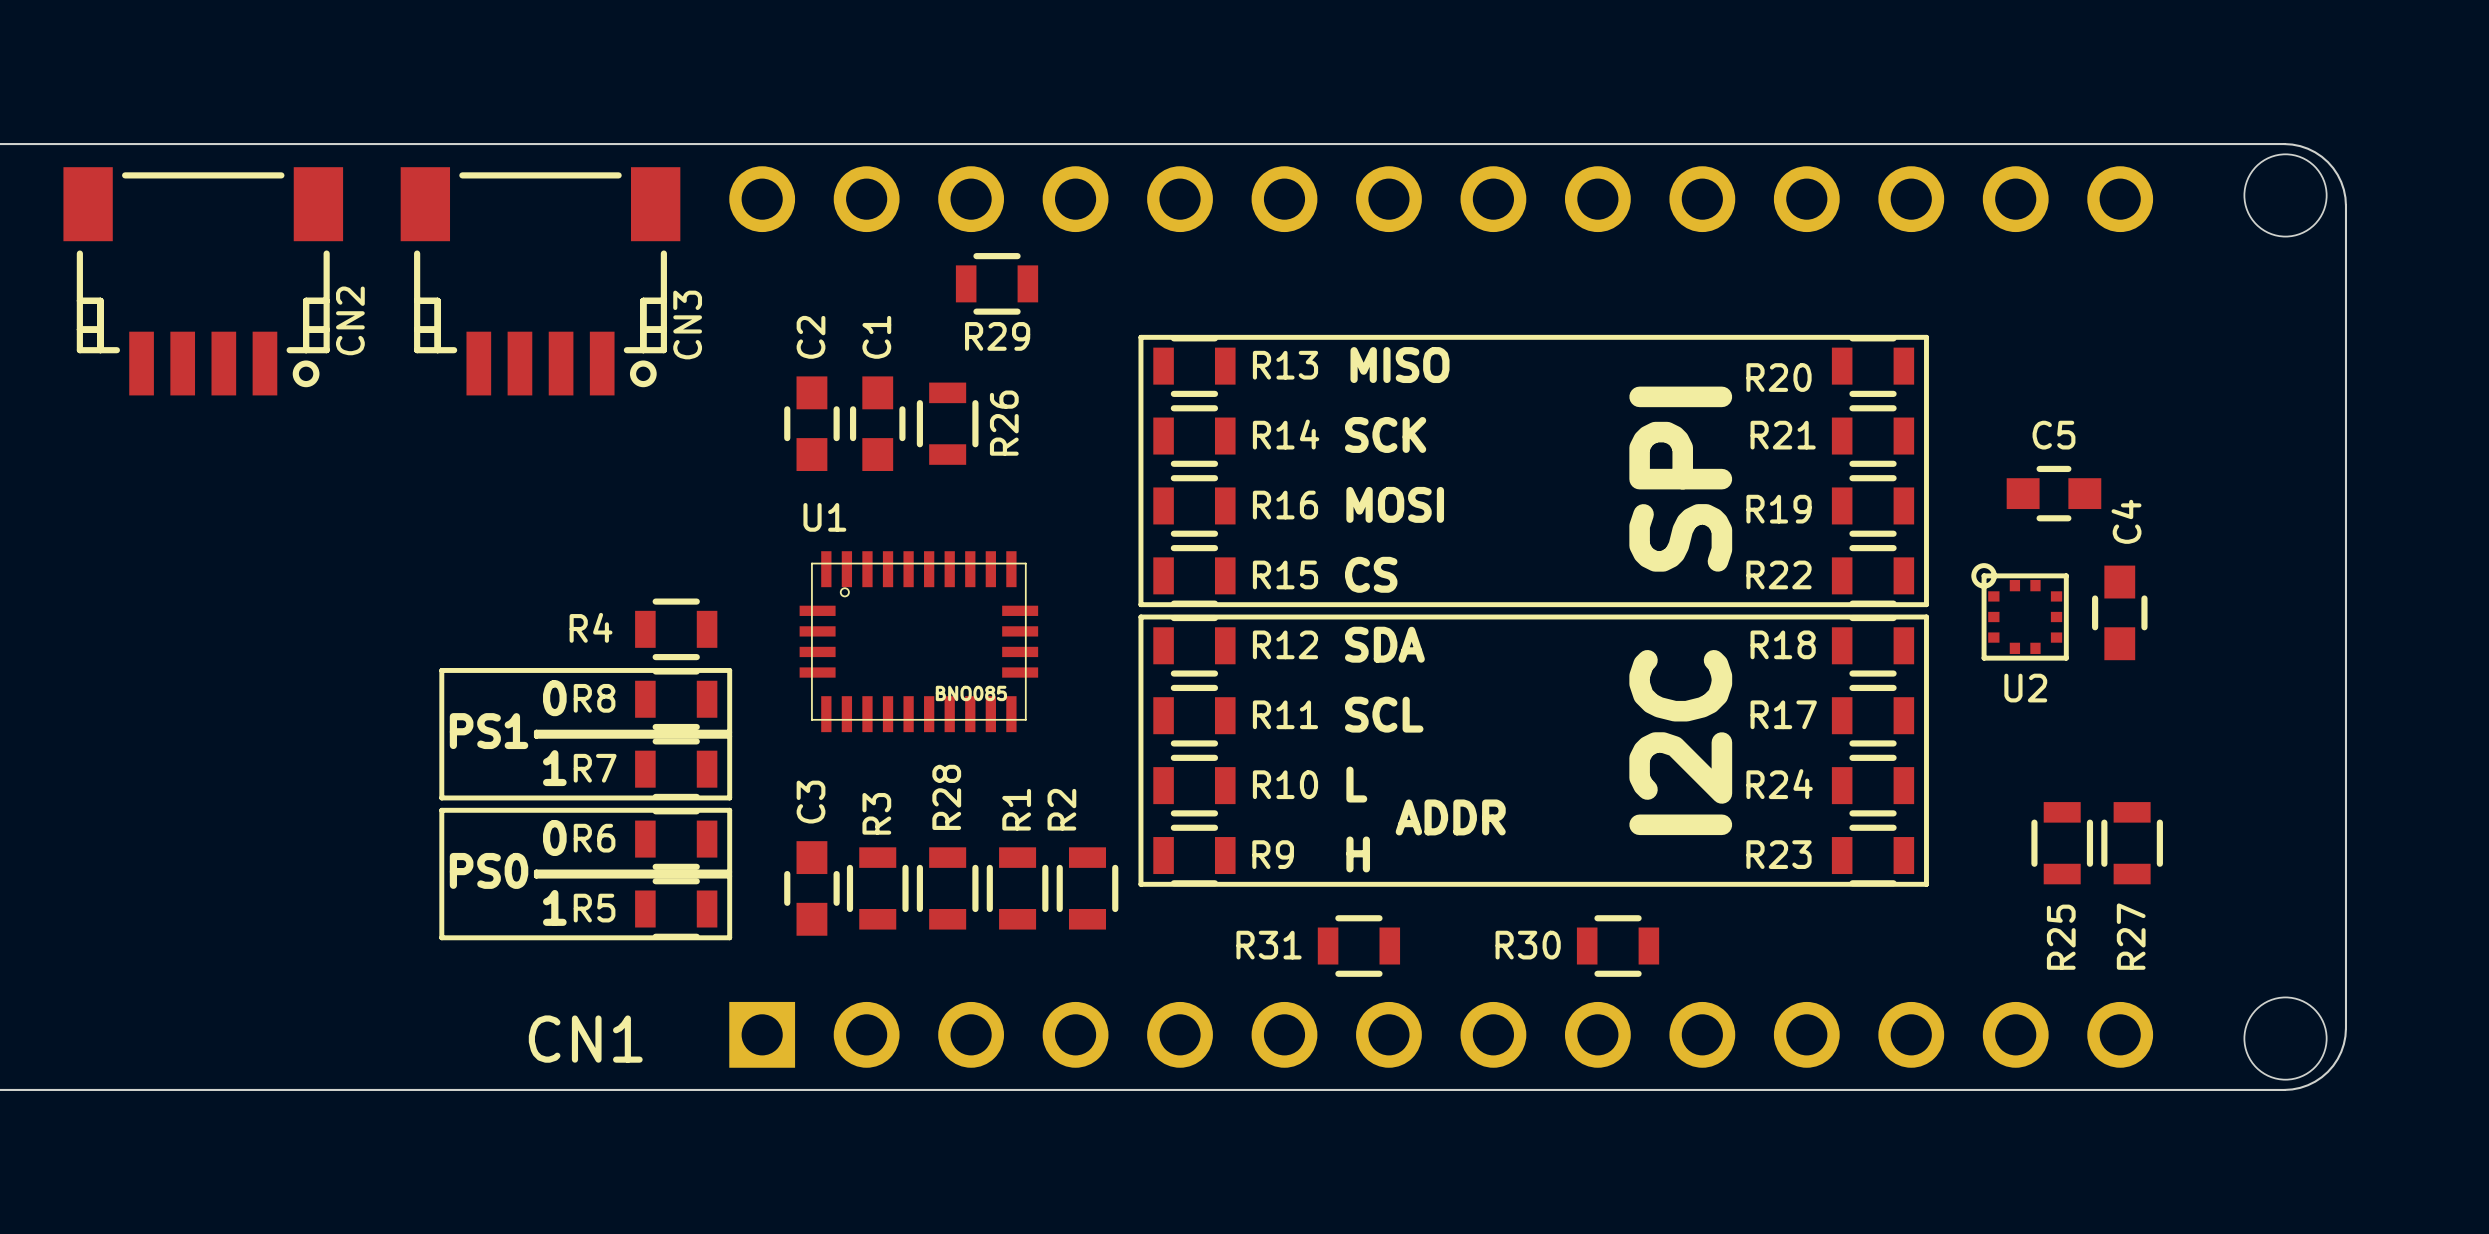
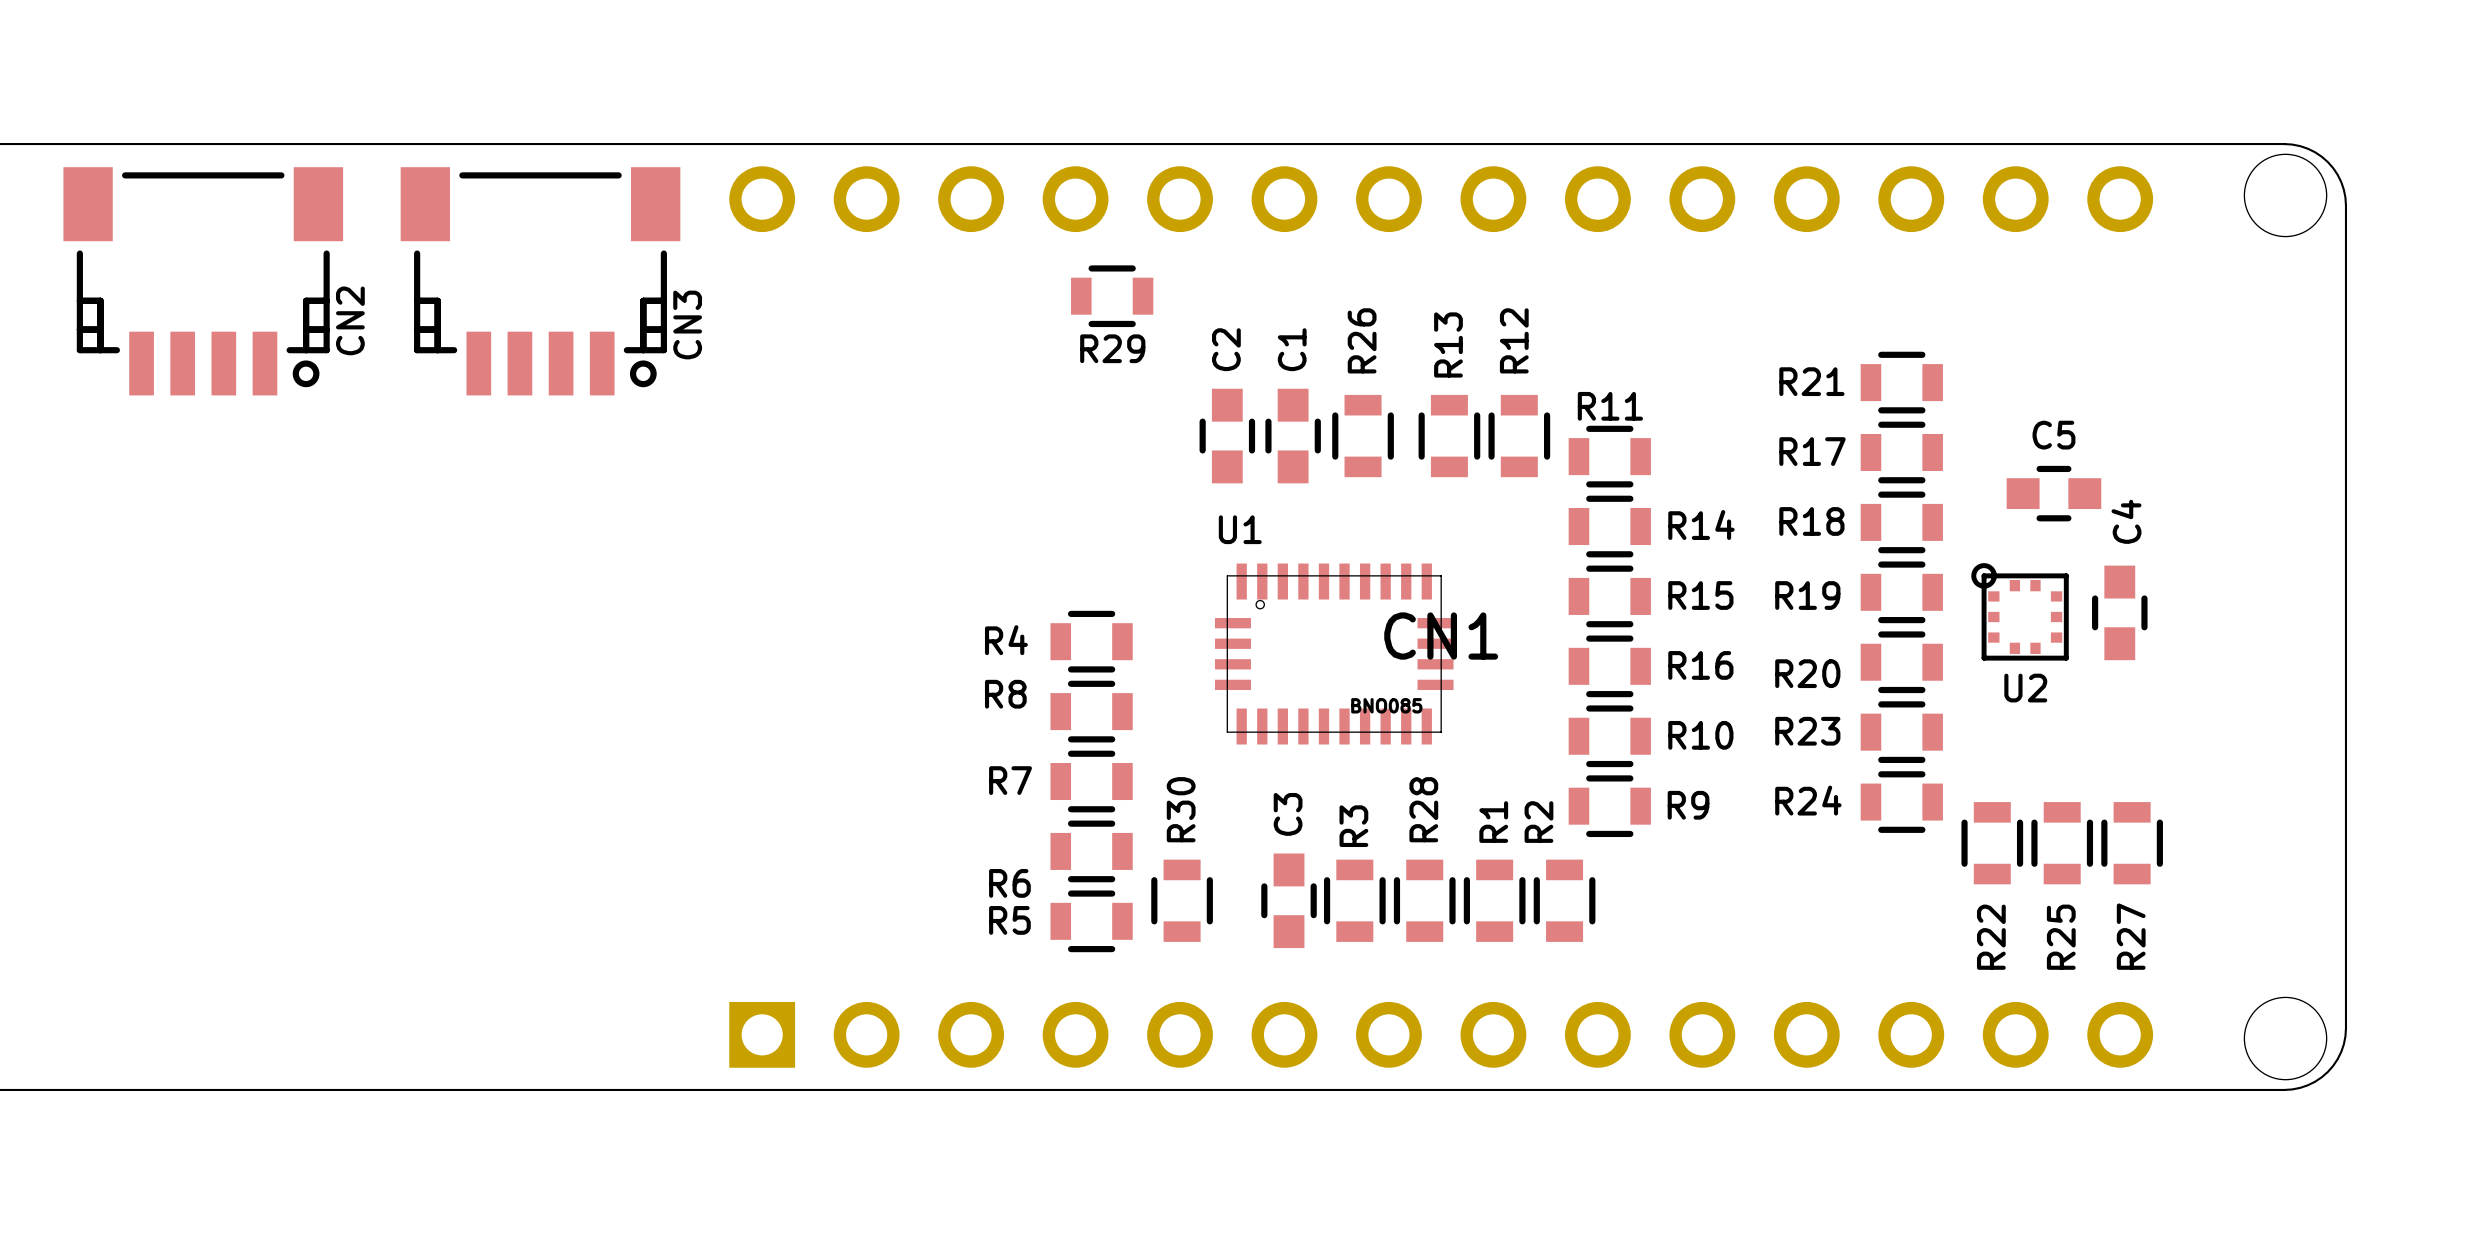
R29 position: (997, 283) -> (1112, 296)
line: (1140, 337) (1140, 604) (1926, 604) (1926, 337) (1140, 337) -> none
R13 name position: R13 (1285, 365) -> R13 (1448, 344)
text: MISO (1399, 365) -> none
R13 rotation: 0° (1194, 366) -> 90° clockwise (1449, 436)
R13 position: (1194, 366) -> (1449, 436)
R20 position: (1873, 366) -> (1901, 662)
C2 position: (811, 423) -> (1227, 436)
C1 position: (877, 423) -> (1293, 436)
R26 position: (947, 423) -> (1363, 436)
R26 name position: R26 (1004, 423) -> R26 (1362, 340)
text: SCK (1385, 434) -> none
R14 position: (1194, 436) -> (1609, 526)
R21 position: (1873, 436) -> (1901, 382)
text: SPI (1680, 479) -> none
text: MOSI (1395, 504) -> none
R16 position: (1194, 505) -> (1609, 666)
R19 position: (1873, 505) -> (1901, 592)
text: CS (1371, 574) -> none
R22 name position: R22 (1779, 574) -> R22 (1991, 937)
R15 position: (1194, 575) -> (1609, 596)
R22 rotation: 0° (1873, 575) -> 90° clockwise (1992, 843)
R22 position: (1873, 575) -> (1992, 843)
line: (1140, 617) (1140, 884) (1926, 884) (1926, 617) (1140, 617) -> none
R4 position: (676, 629) -> (1091, 641)
U1 position: (918, 641) -> (1334, 654)
R12 name position: R12 (1285, 644) -> R12 (1514, 340)
text: SDA (1384, 644) -> none
R12 rotation: 0° (1194, 645) -> 90° clockwise (1519, 436)
R12 position: (1194, 645) -> (1519, 436)
R18 position: (1873, 645) -> (1901, 522)
line: (441, 670) (441, 797) (729, 797) (729, 670) (441, 670) -> none
text: 0 (554, 698) -> none
R8 name position: R8 (594, 698) -> R8 (1005, 694)
R8 position: (676, 699) -> (1091, 711)
R11 name position: R11 (1285, 714) -> R11 (1610, 406)
text: SCL (1384, 714) -> none
R11 position: (1194, 715) -> (1609, 456)
R17 position: (1873, 715) -> (1901, 452)
text: PS1 (489, 731) -> none
line: (729, 732) (536, 732) (536, 736) (729, 736) -> none
text: I2C (1680, 742) -> none
text: 1 (554, 768) -> none
R7 position: (676, 769) -> (1091, 781)
text: L (1356, 784) -> none
R10 position: (1194, 785) -> (1609, 736)
R24 position: (1873, 785) -> (1901, 802)
line: (441, 810) (441, 937) (729, 937) (729, 810) (441, 810) -> none
text: ADDR (1450, 817) -> none
text: 0 (554, 838) -> none
R6 name position: R6 (594, 838) -> R6 (1009, 883)
R6 position: (676, 839) -> (1091, 851)
text: H (1358, 854) -> none
R9 position: (1194, 855) -> (1609, 806)
R23 position: (1873, 855) -> (1901, 732)
text: PS0 (489, 870) -> none
line: (729, 871) (536, 871) (536, 876) (729, 876) -> none
C3 position: (811, 888) -> (1289, 900)
R3 position: (877, 888) -> (1354, 900)
R28 position: (947, 888) -> (1424, 900)
R1 position: (1017, 888) -> (1494, 900)
R2 position: (1087, 888) -> (1564, 900)
text: 1 (554, 907) -> none
R5 position: (676, 909) -> (1091, 921)
R31: (1358, 946) -> none
R30 rotation: 0° (1618, 946) -> 90° clockwise (1182, 900)
R30 position: (1618, 946) -> (1182, 900)
CN1 name position: CN1 (585, 1039) -> CN1 (1441, 636)

